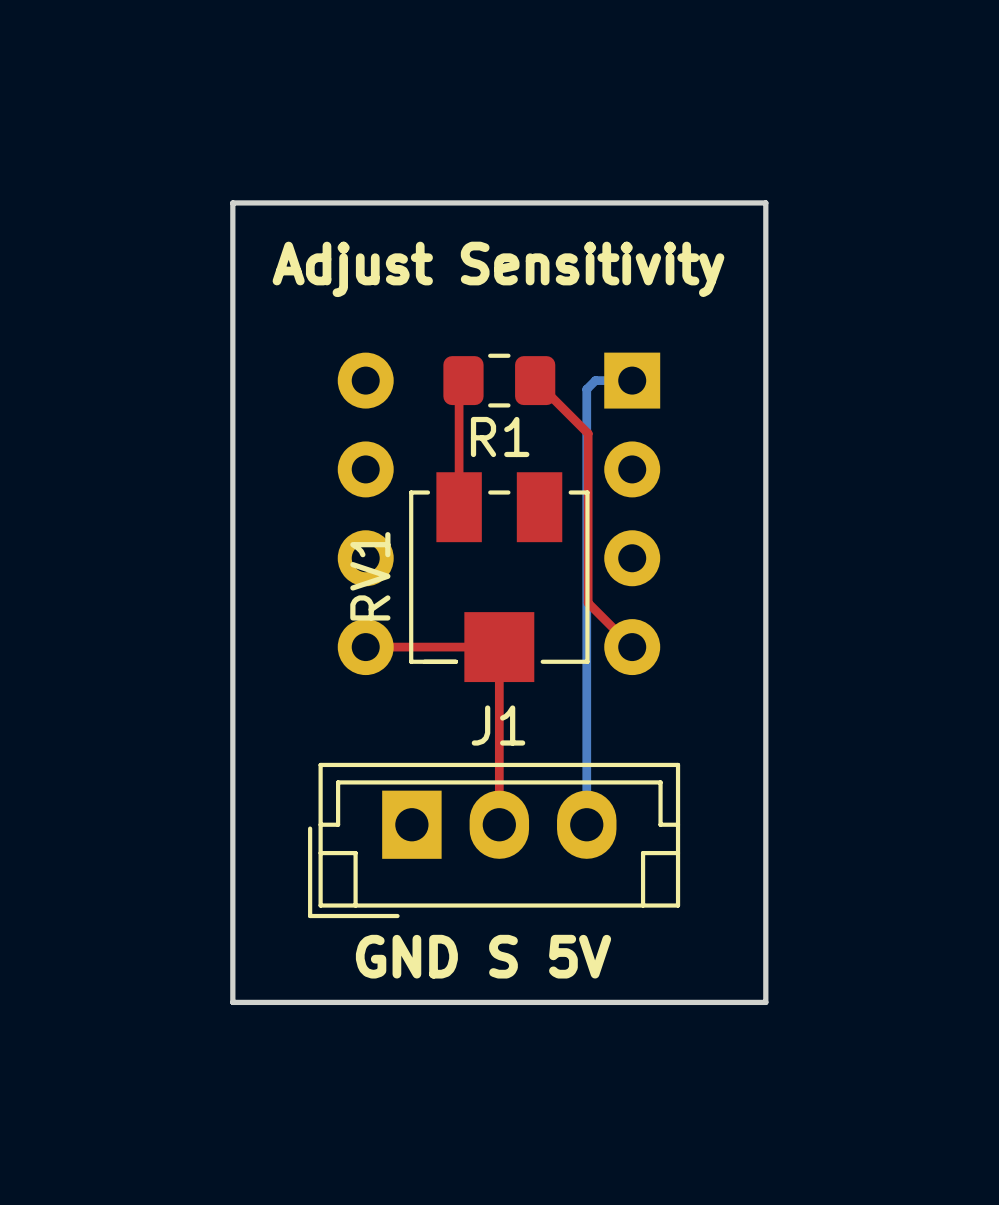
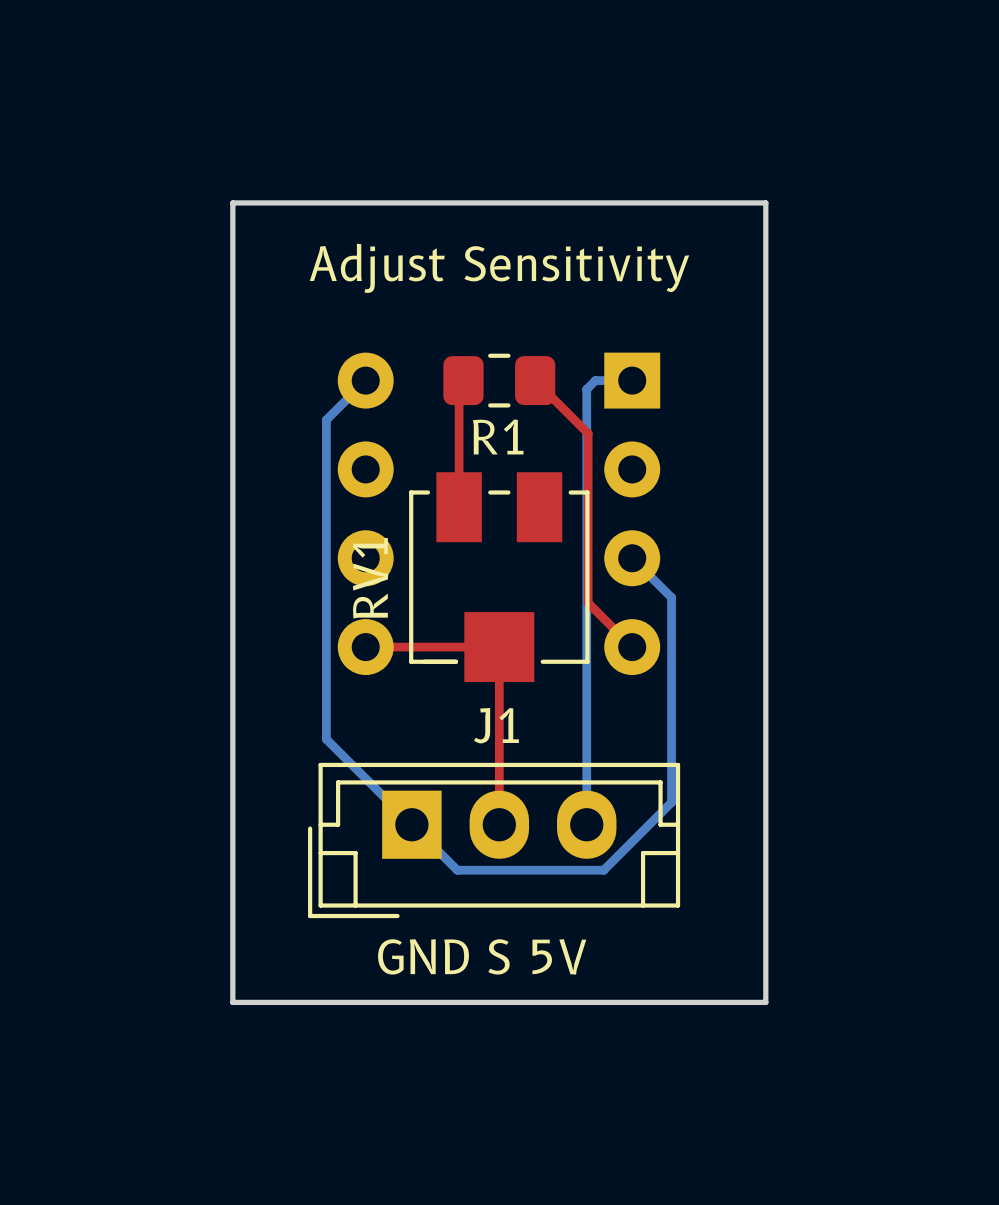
bottom track: none -> (365, 380) (326, 419) (326, 739) (457, 870) (603, 870) (671, 802) (671, 597) (632, 558)

